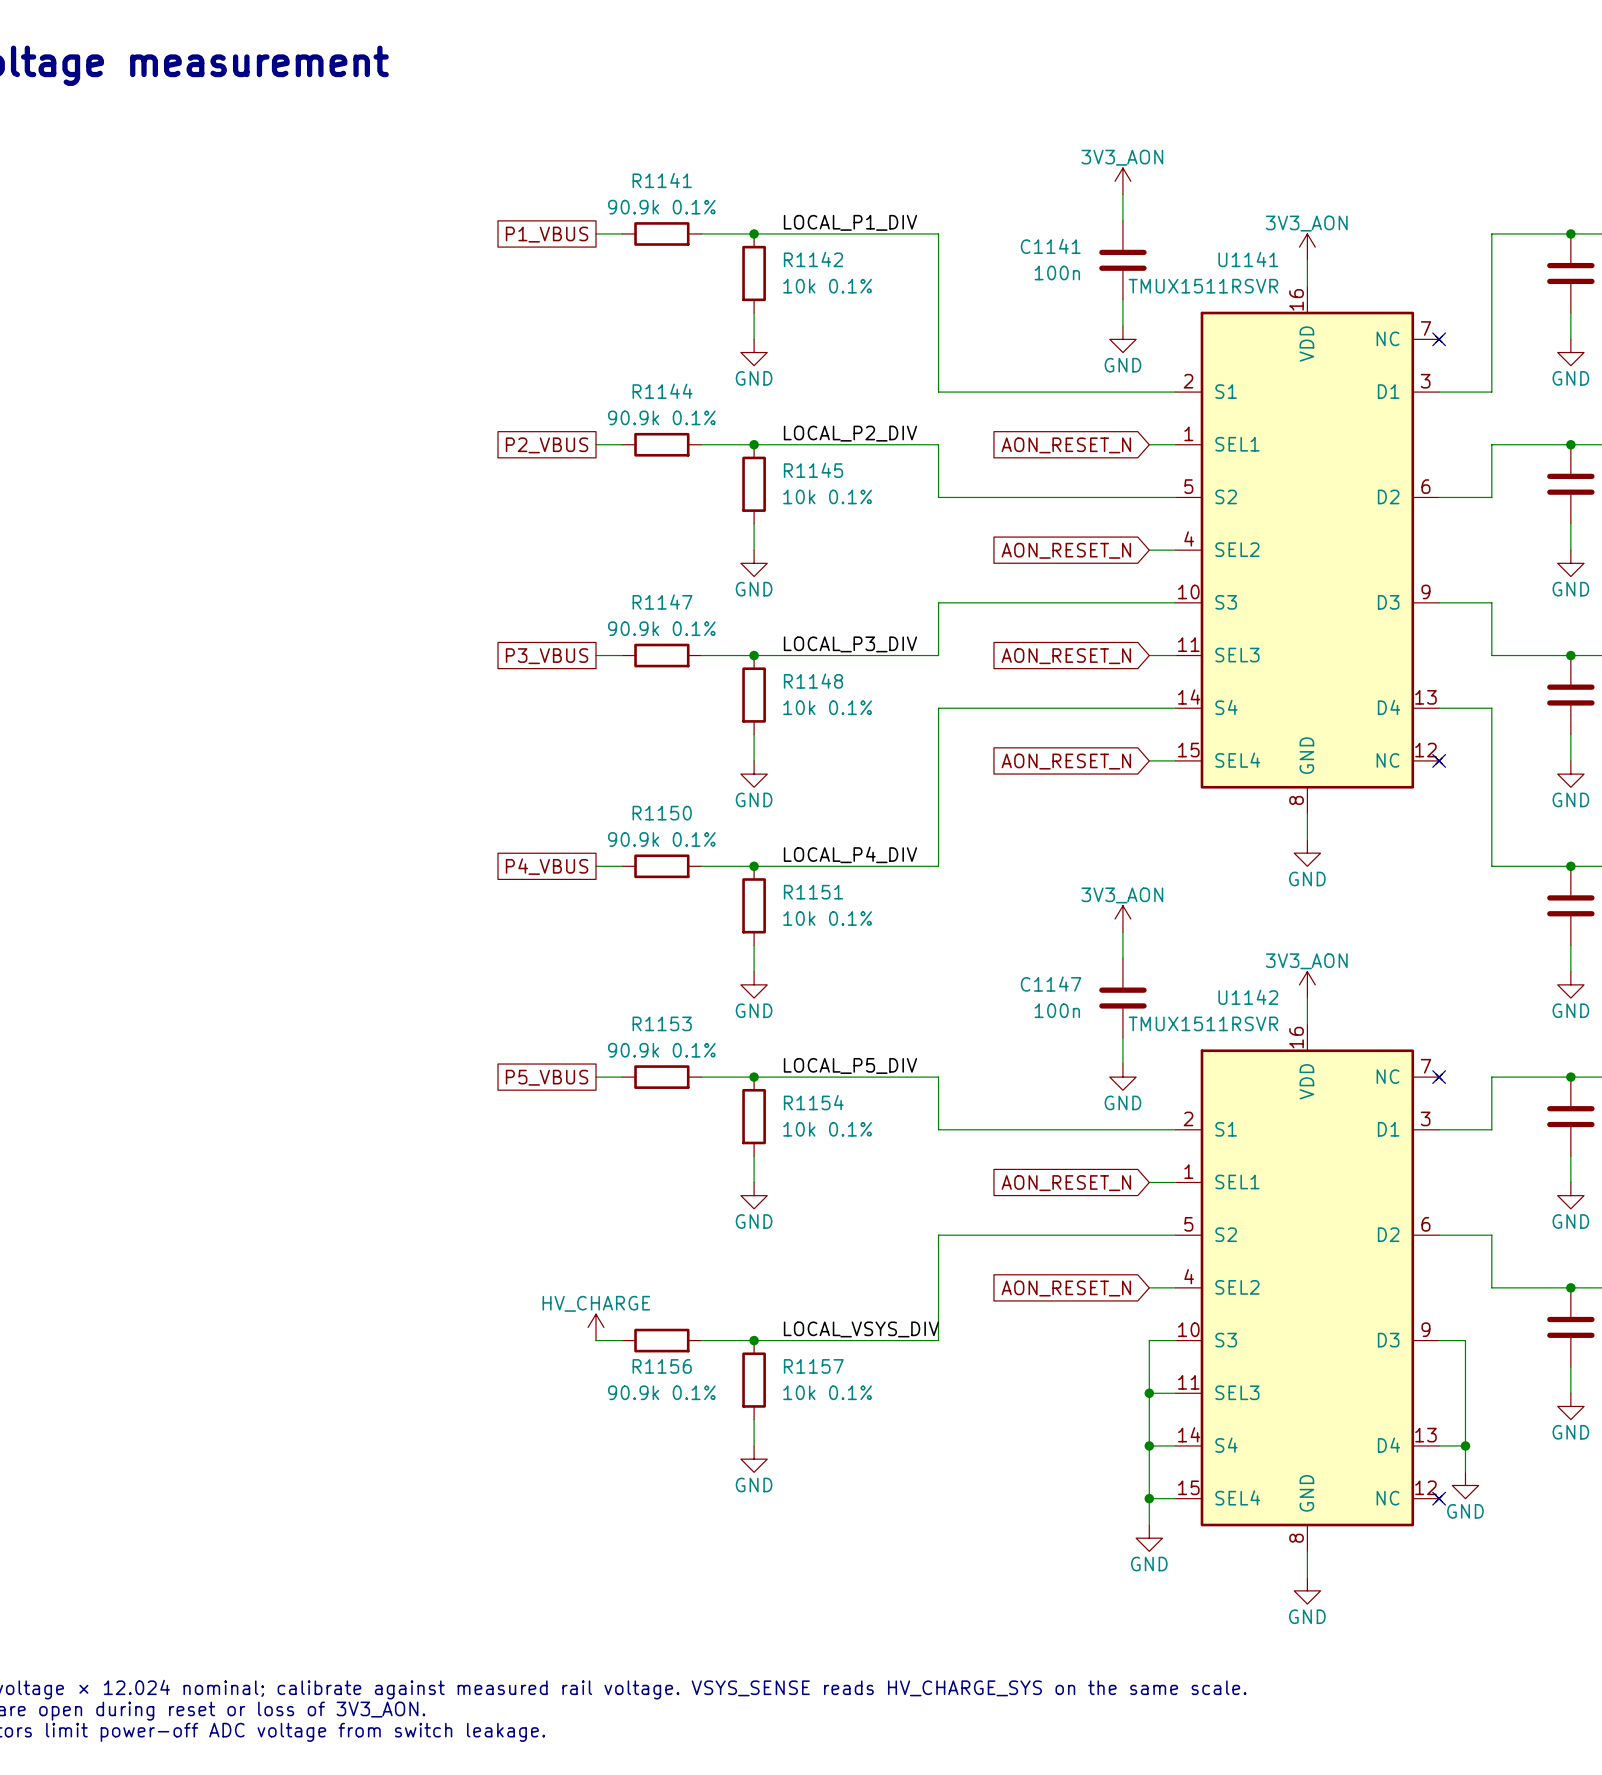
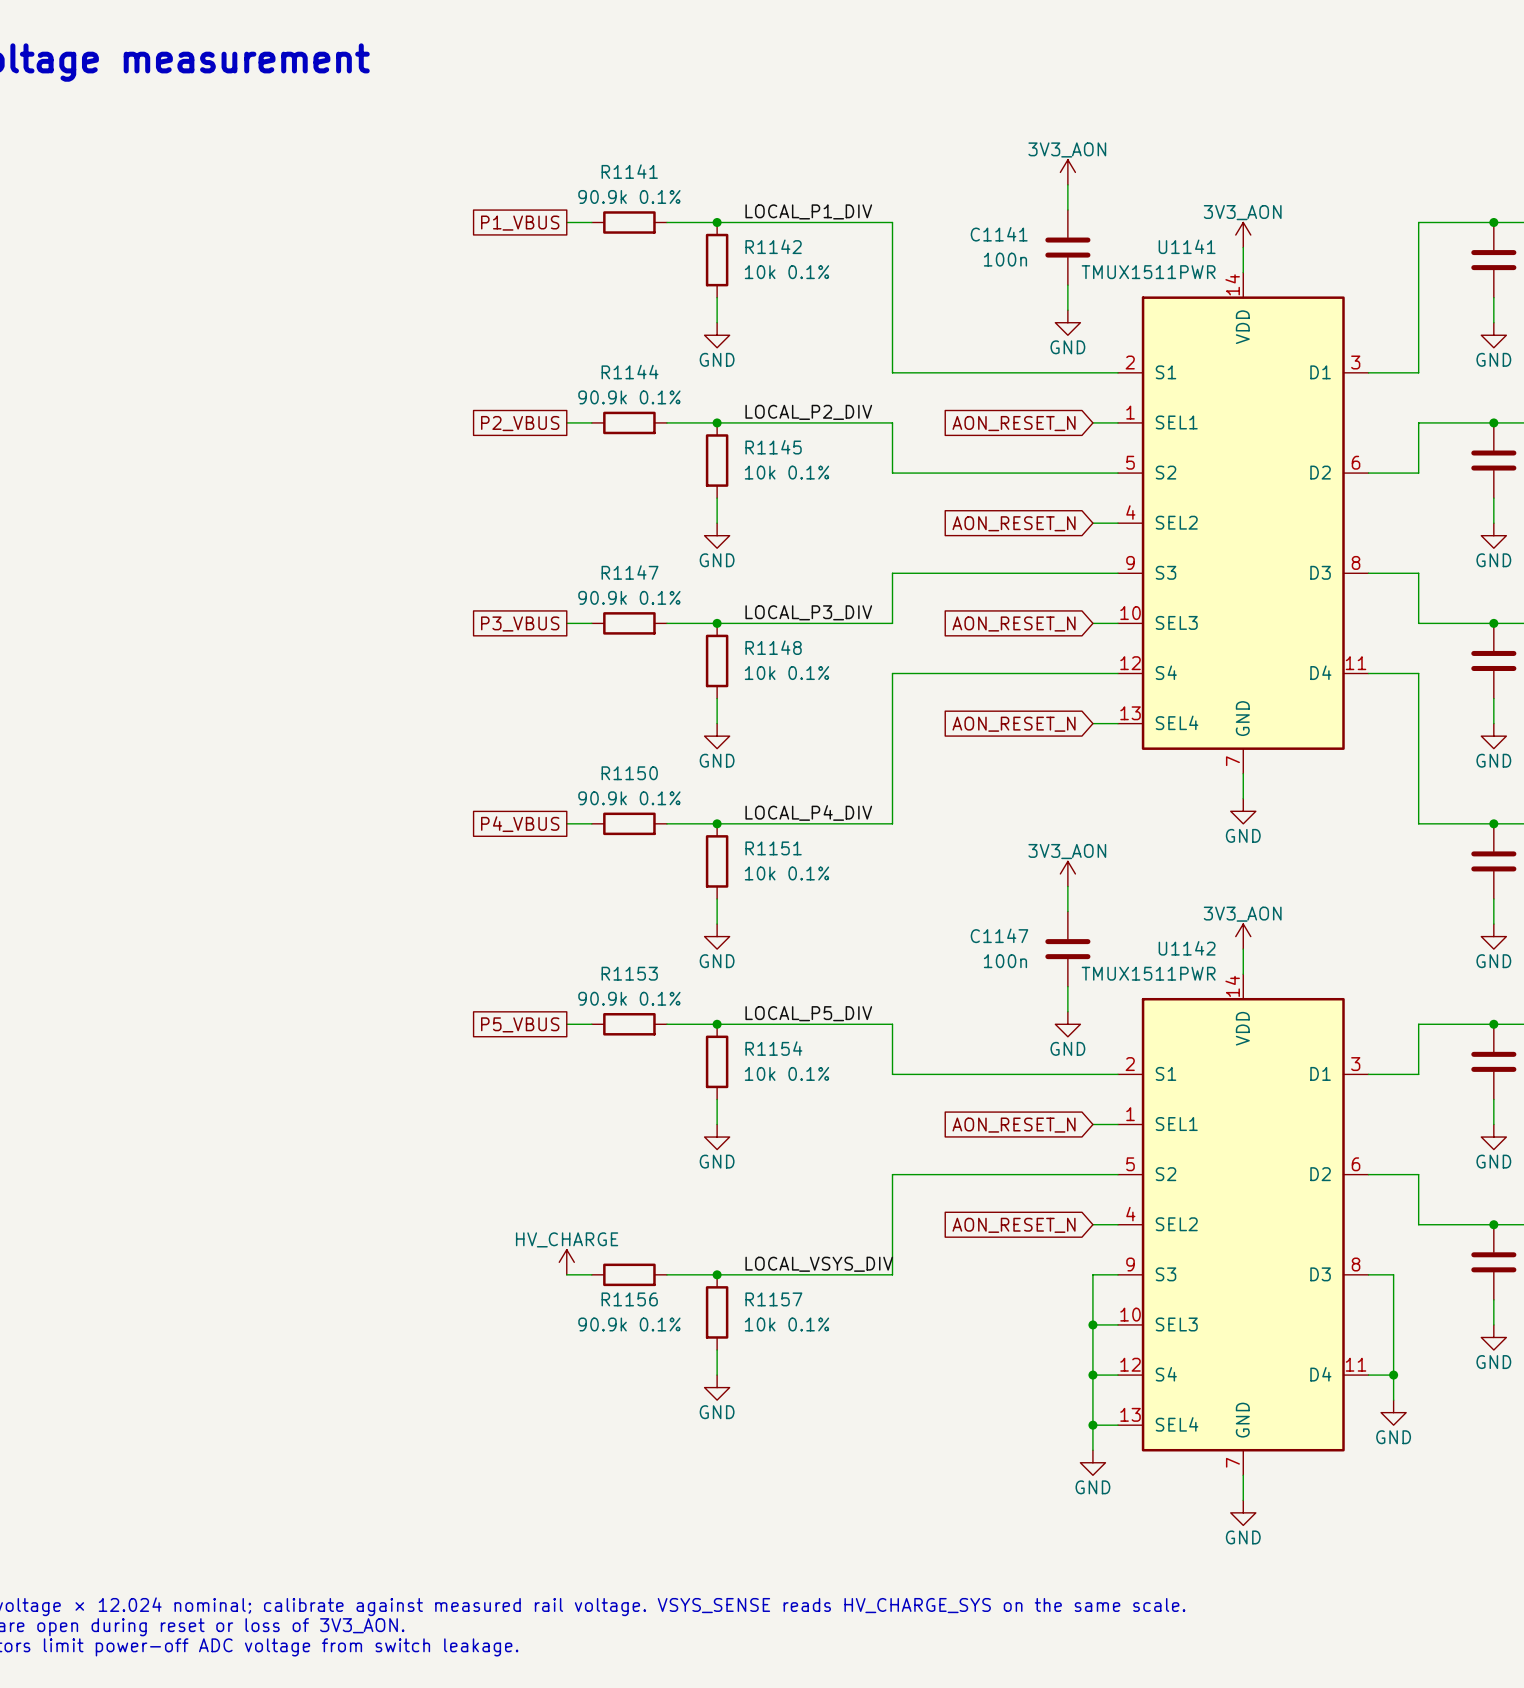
U1141 symbol: [1175, 286, 1443, 814] -> [1118, 272, 1369, 774]
U1141 value: TMUX1511RSVR (1203, 286) -> TMUX1511PWR (1148, 272)
no-connect mark: (1439, 339) -> none
no-connect mark: (1439, 760) -> none
U1142 value: TMUX1511RSVR (1203, 1023) -> TMUX1511PWR (1148, 973)
U1142 symbol: [1175, 1024, 1443, 1552] -> [1118, 974, 1369, 1476]
no-connect mark: (1439, 1077) -> none
no-connect mark: (1439, 1498) -> none

